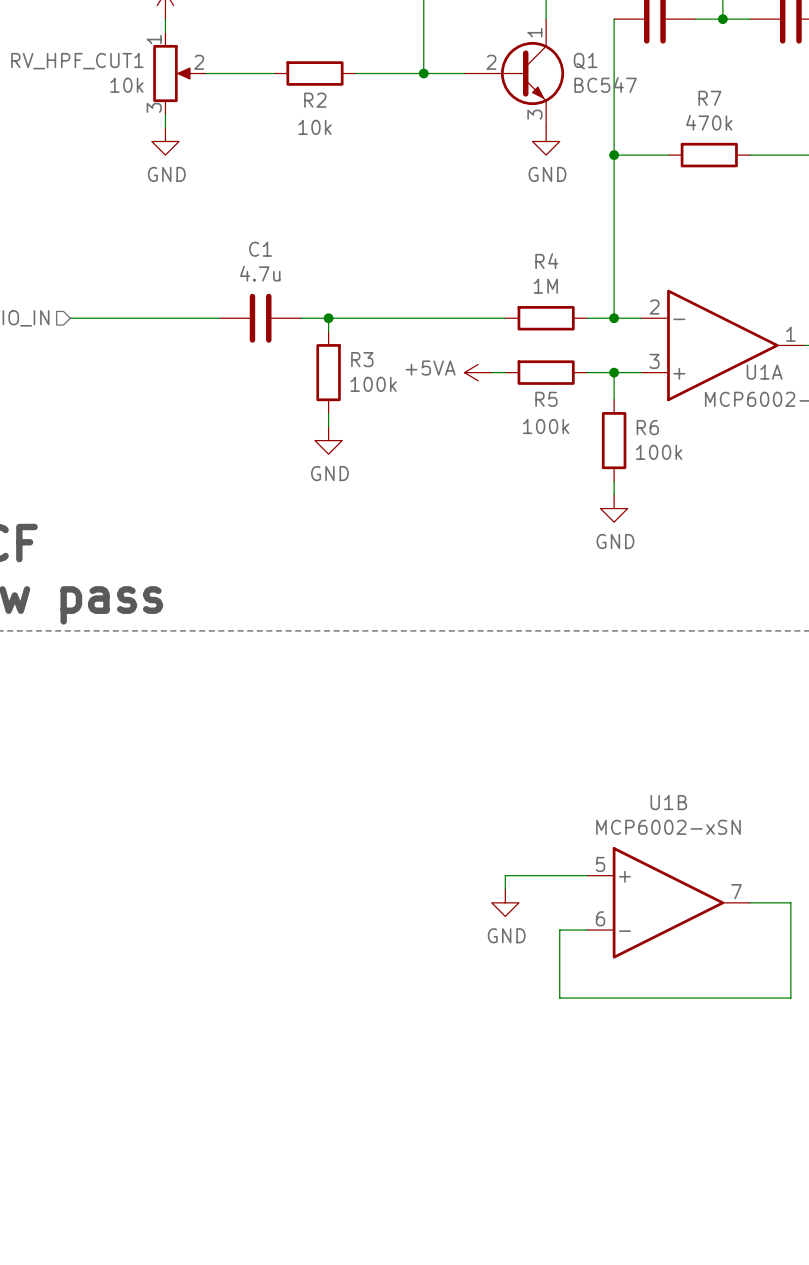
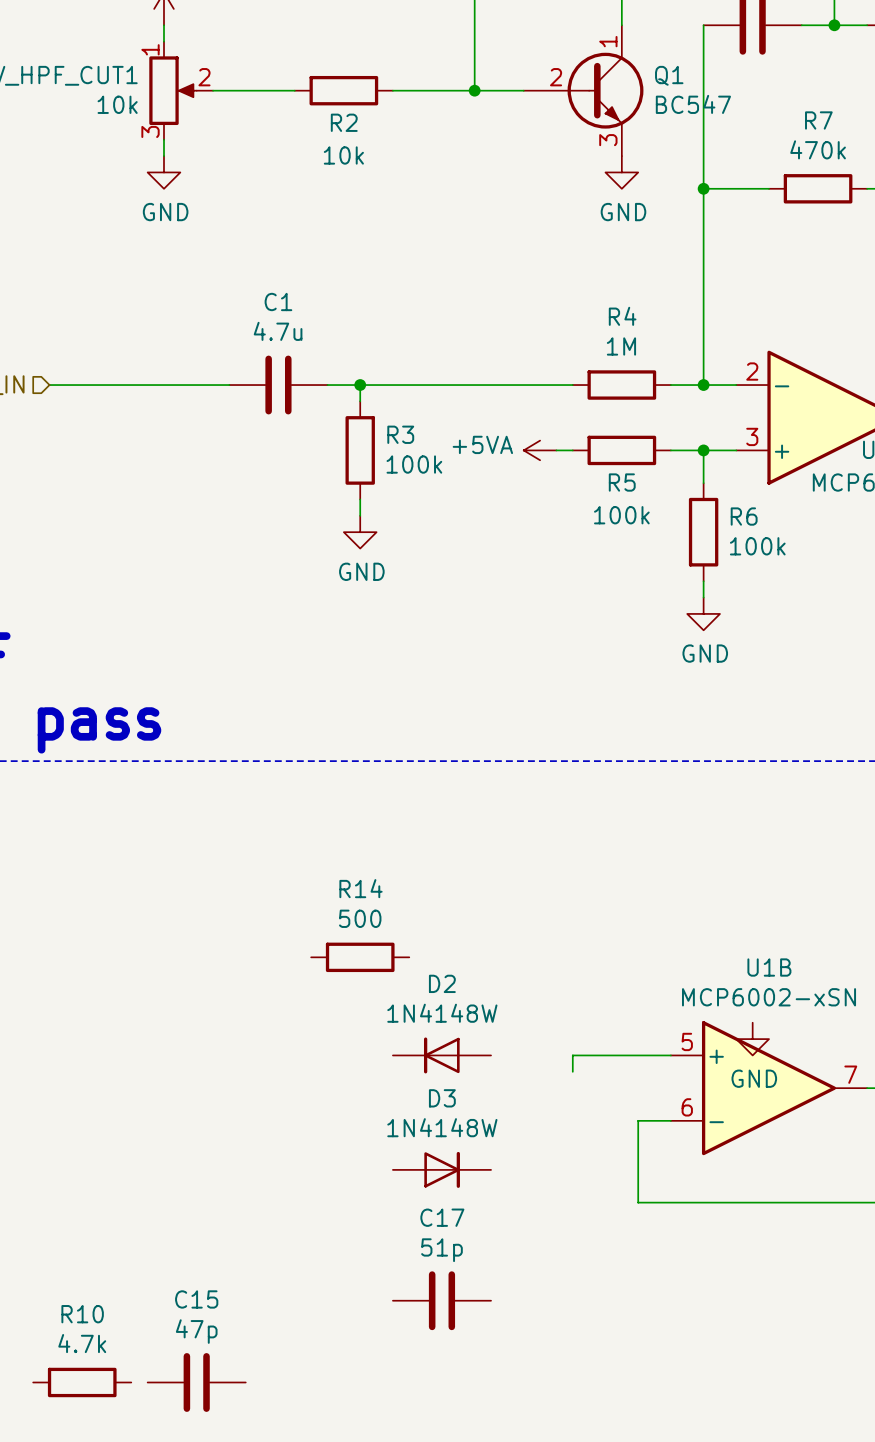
R14: none -> 500 (360, 957)
D2: none -> 1N4148W (441, 1055)
power symbol position: GND (505, 902) -> GND (752, 1039)
D3: none -> 1N4148W (441, 1169)
C17: none -> 51p (441, 1300)
R10: none -> 4.7k (82, 1382)
C15: none -> 47p (196, 1382)

